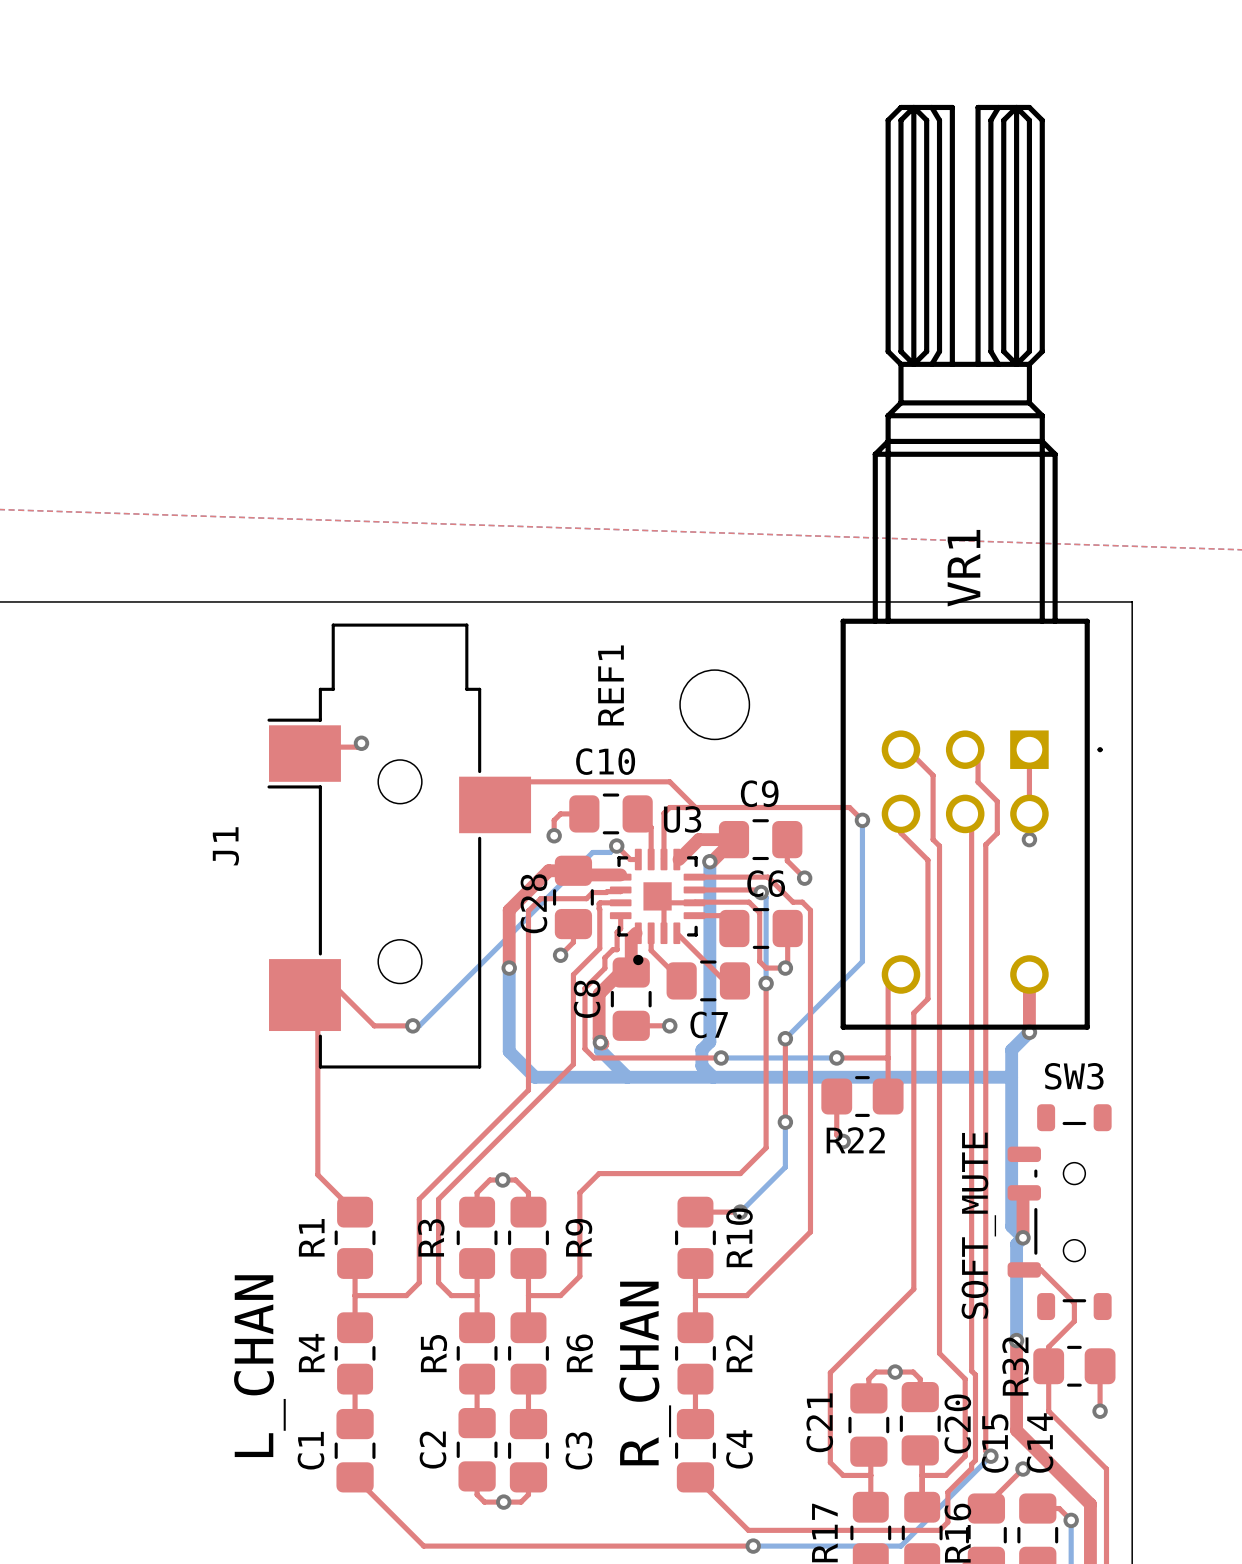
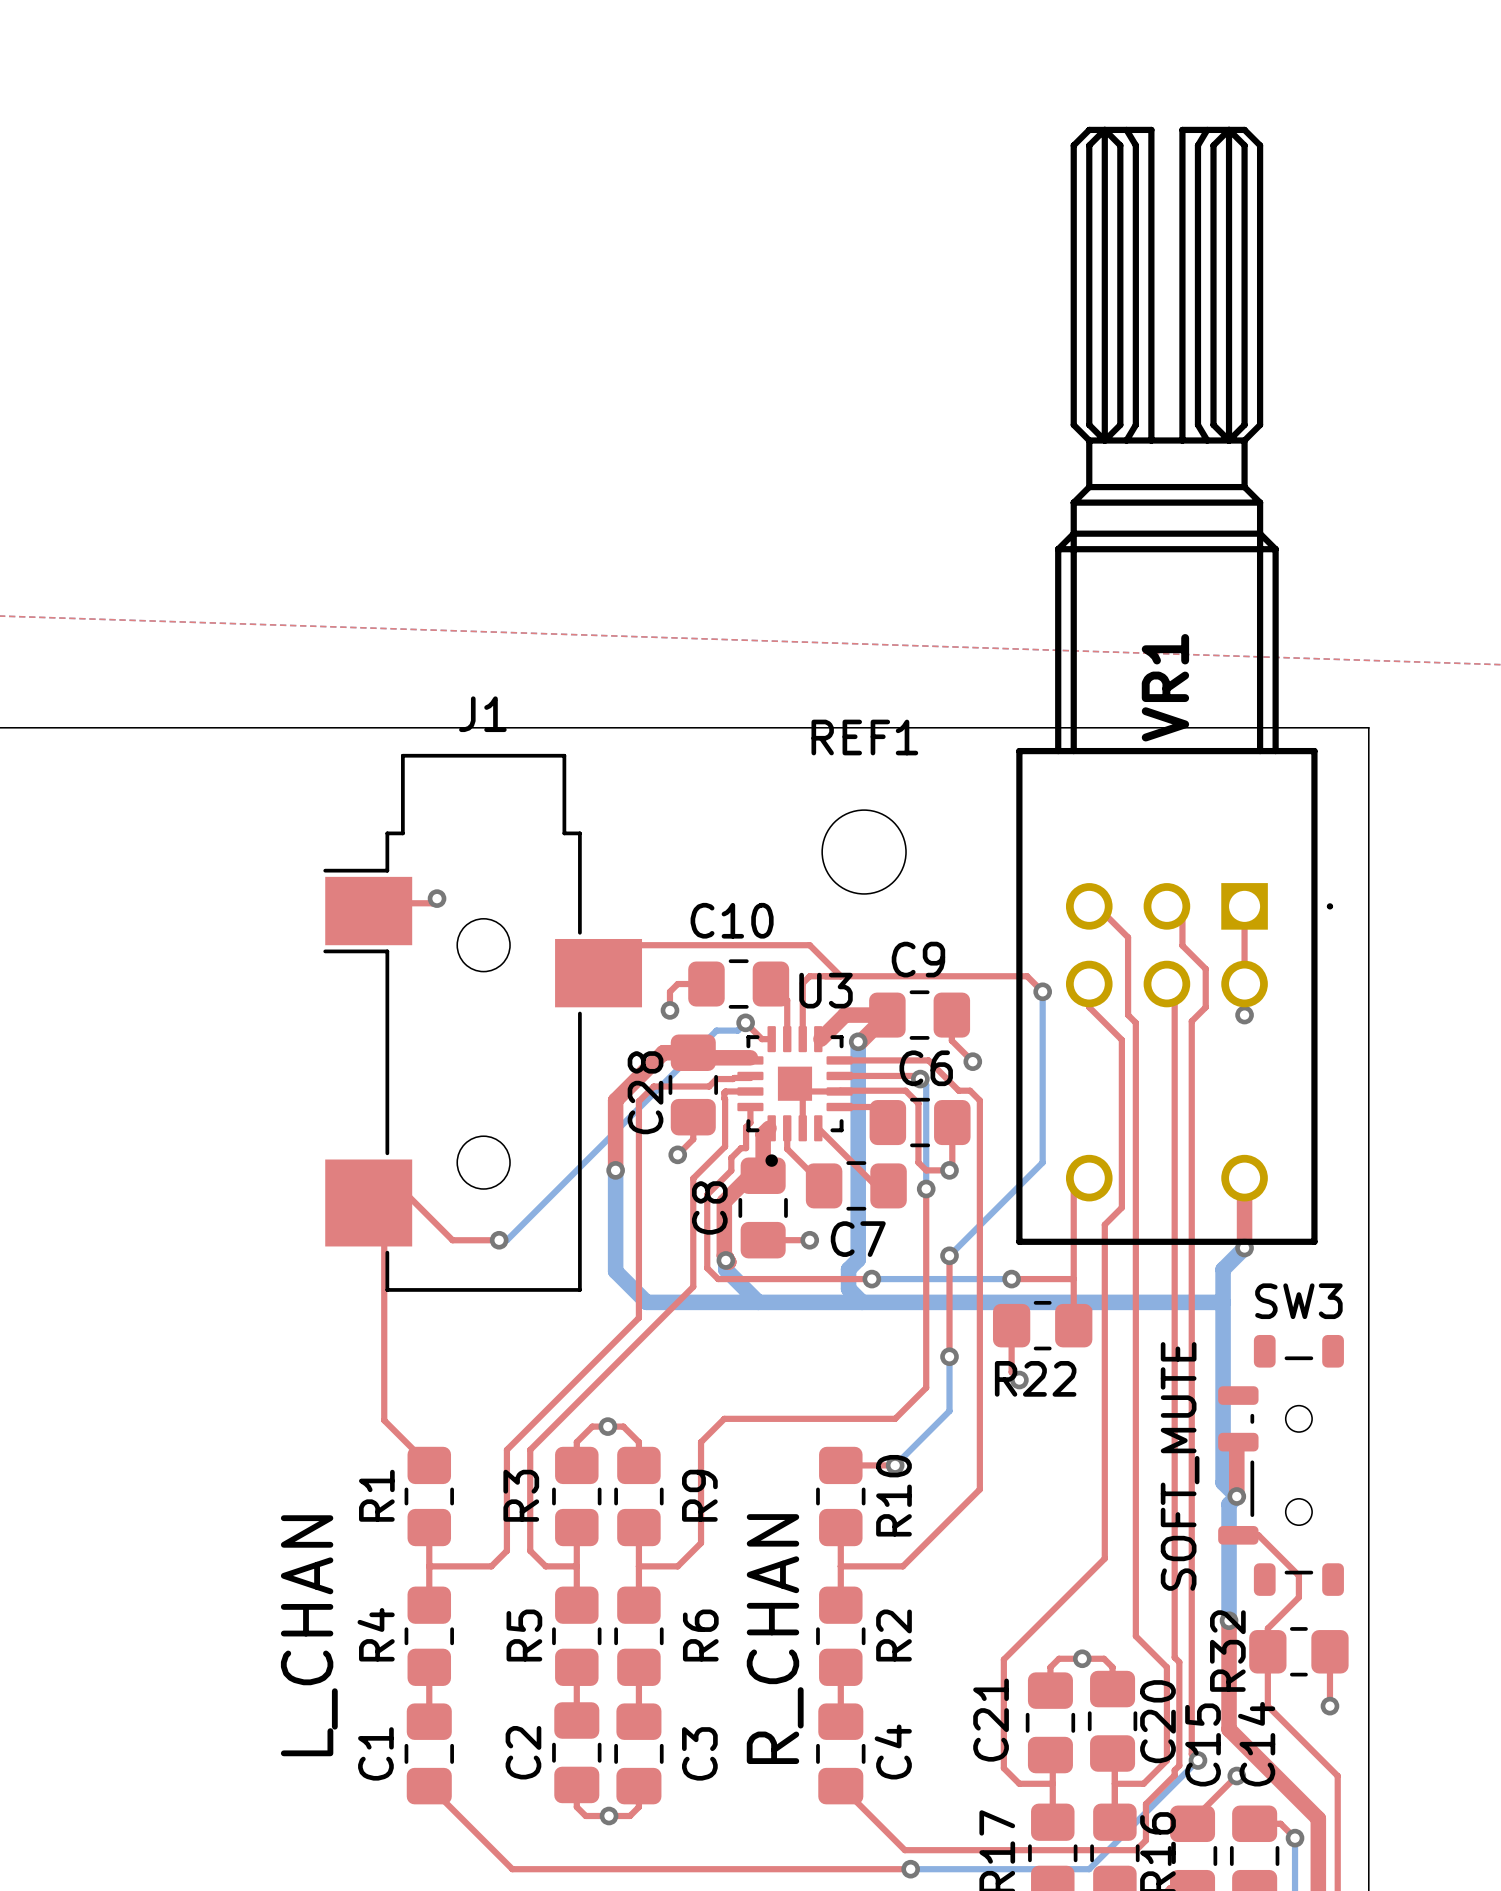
REF1 name rotation: 0° (611, 685) -> 90° clockwise (864, 737)
REF1 name position: REF1 (611, 685) -> REF1 (864, 737)
J1 name rotation: 0° (225, 846) -> 90° clockwise (482, 714)
J1 name position: J1 (225, 846) -> J1 (482, 714)

